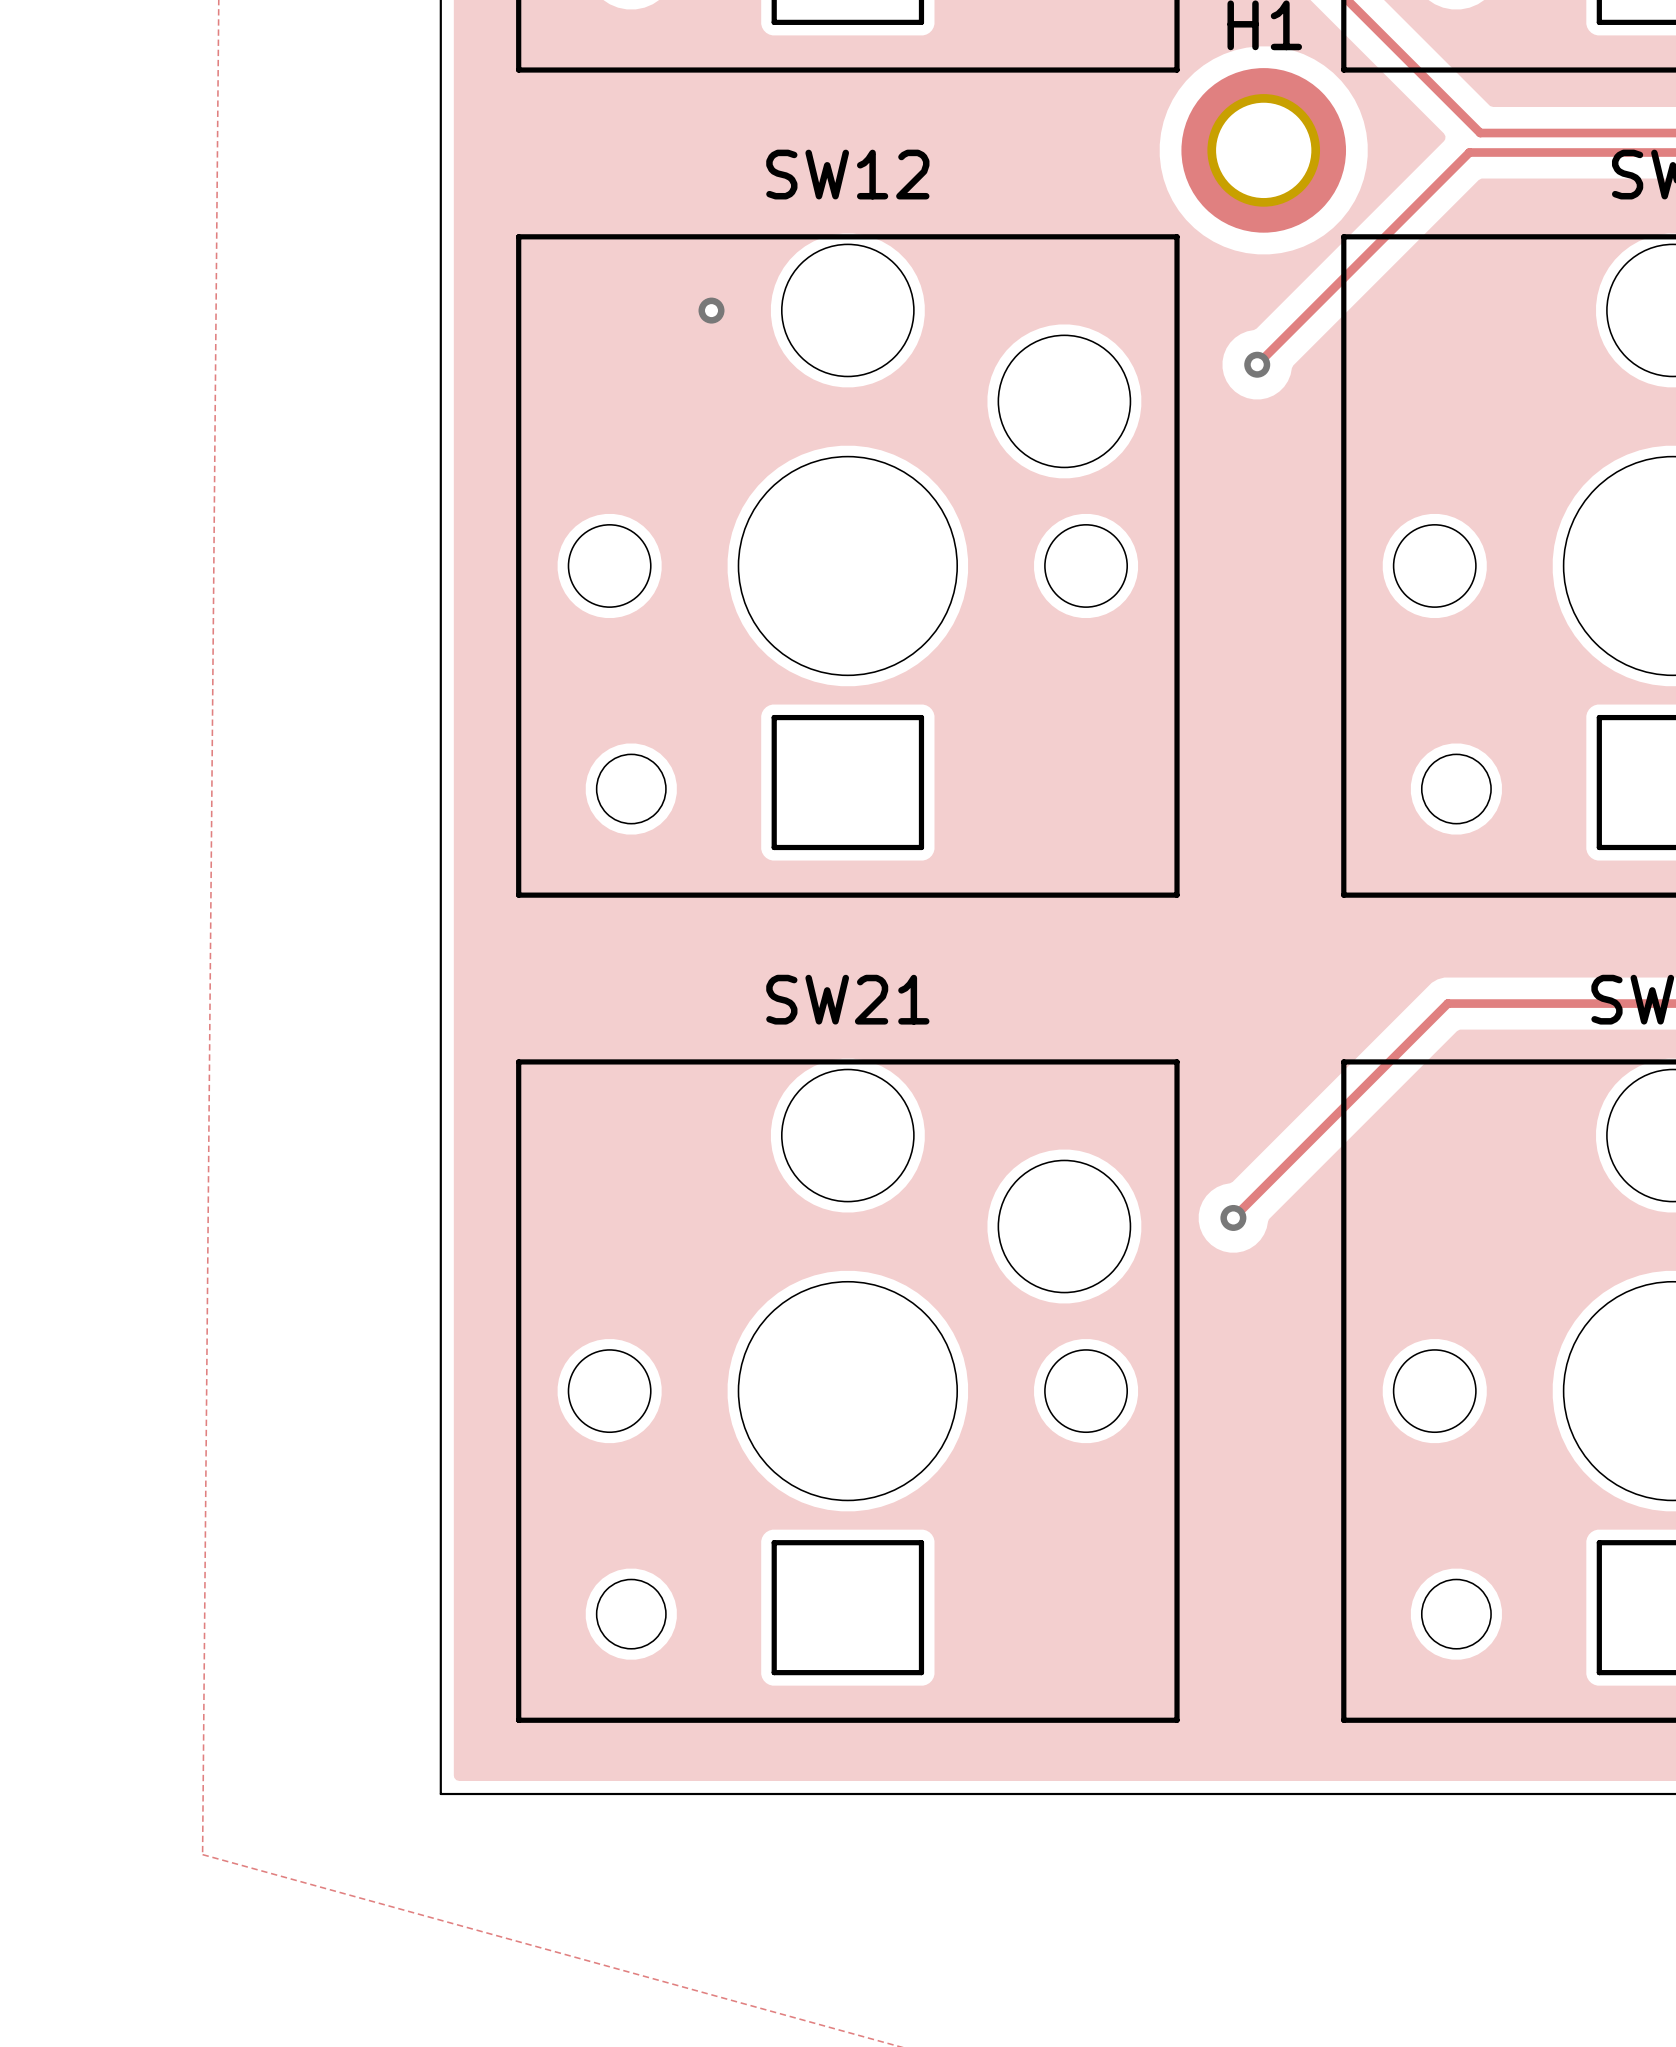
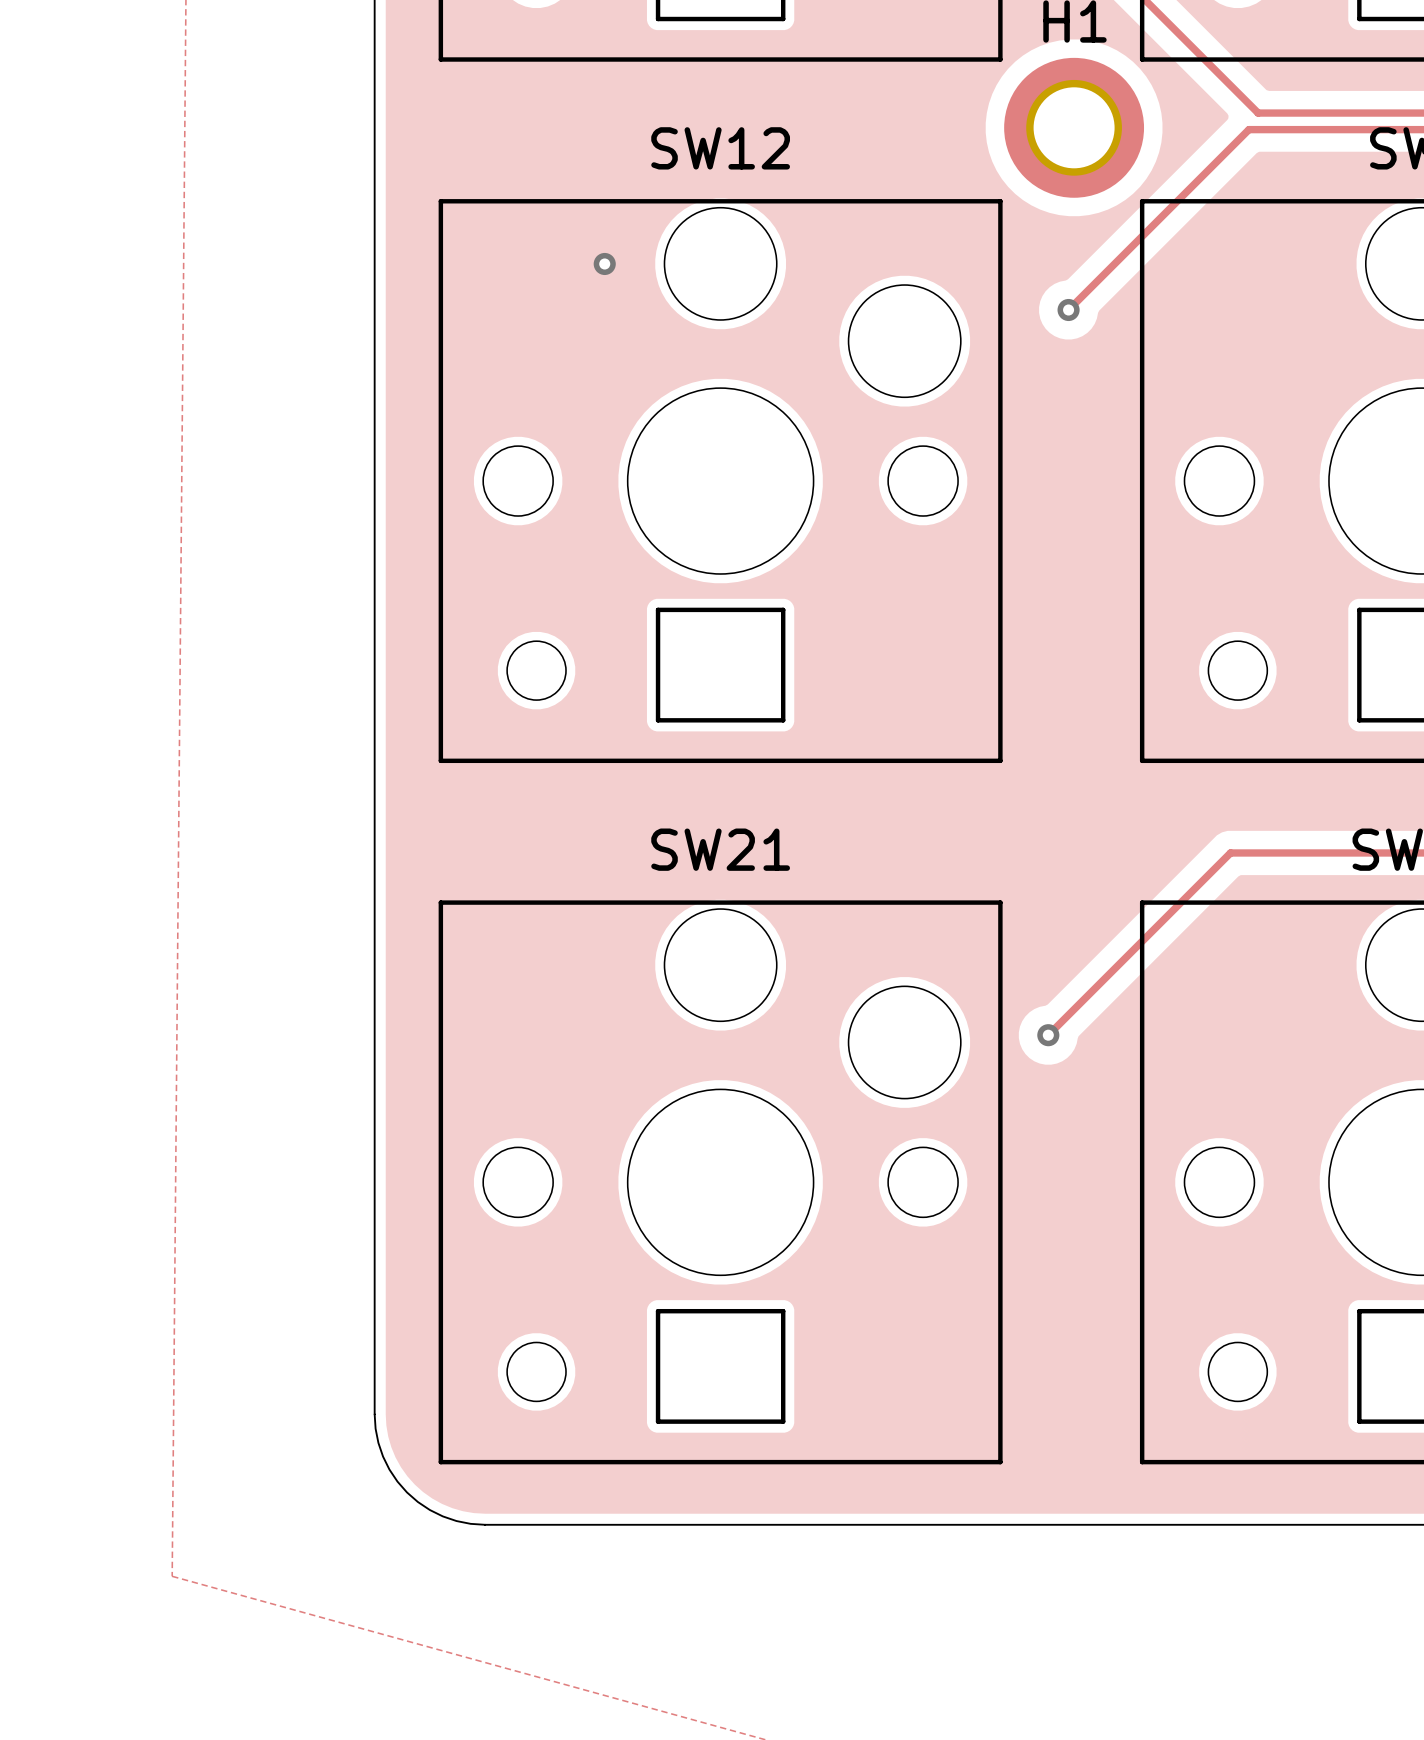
board edge: (440, 1664) (440, 1794) (570, 1794) -> (374, 1414) (375, 1428) (383, 1456) (389, 1469) (407, 1492) (429, 1510) (442, 1516) (456, 1521) (485, 1524)

